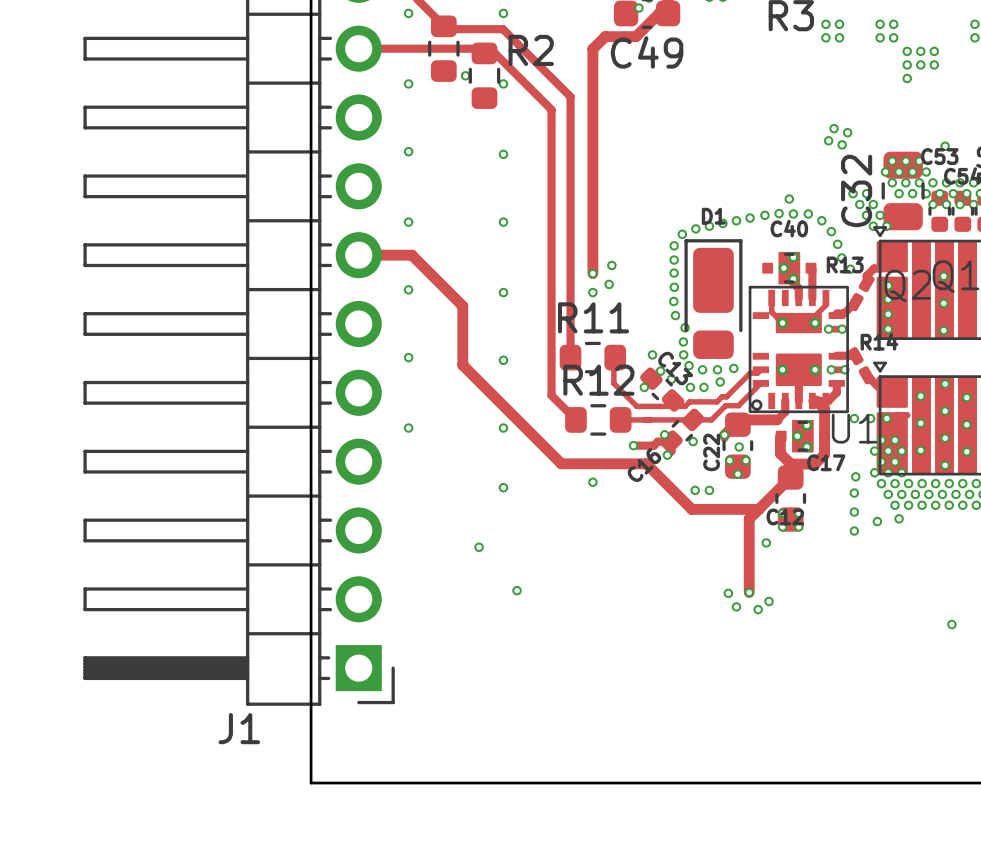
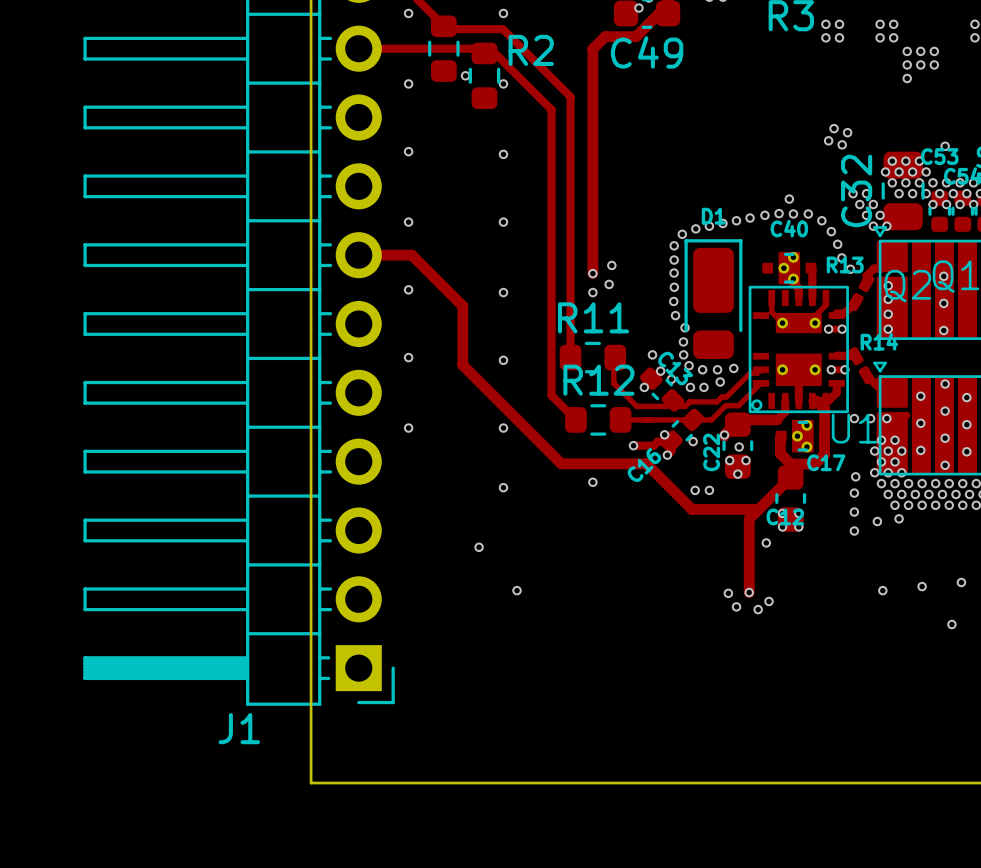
via: none -> (961, 582)
via: none -> (922, 586)
via: none -> (882, 590)

